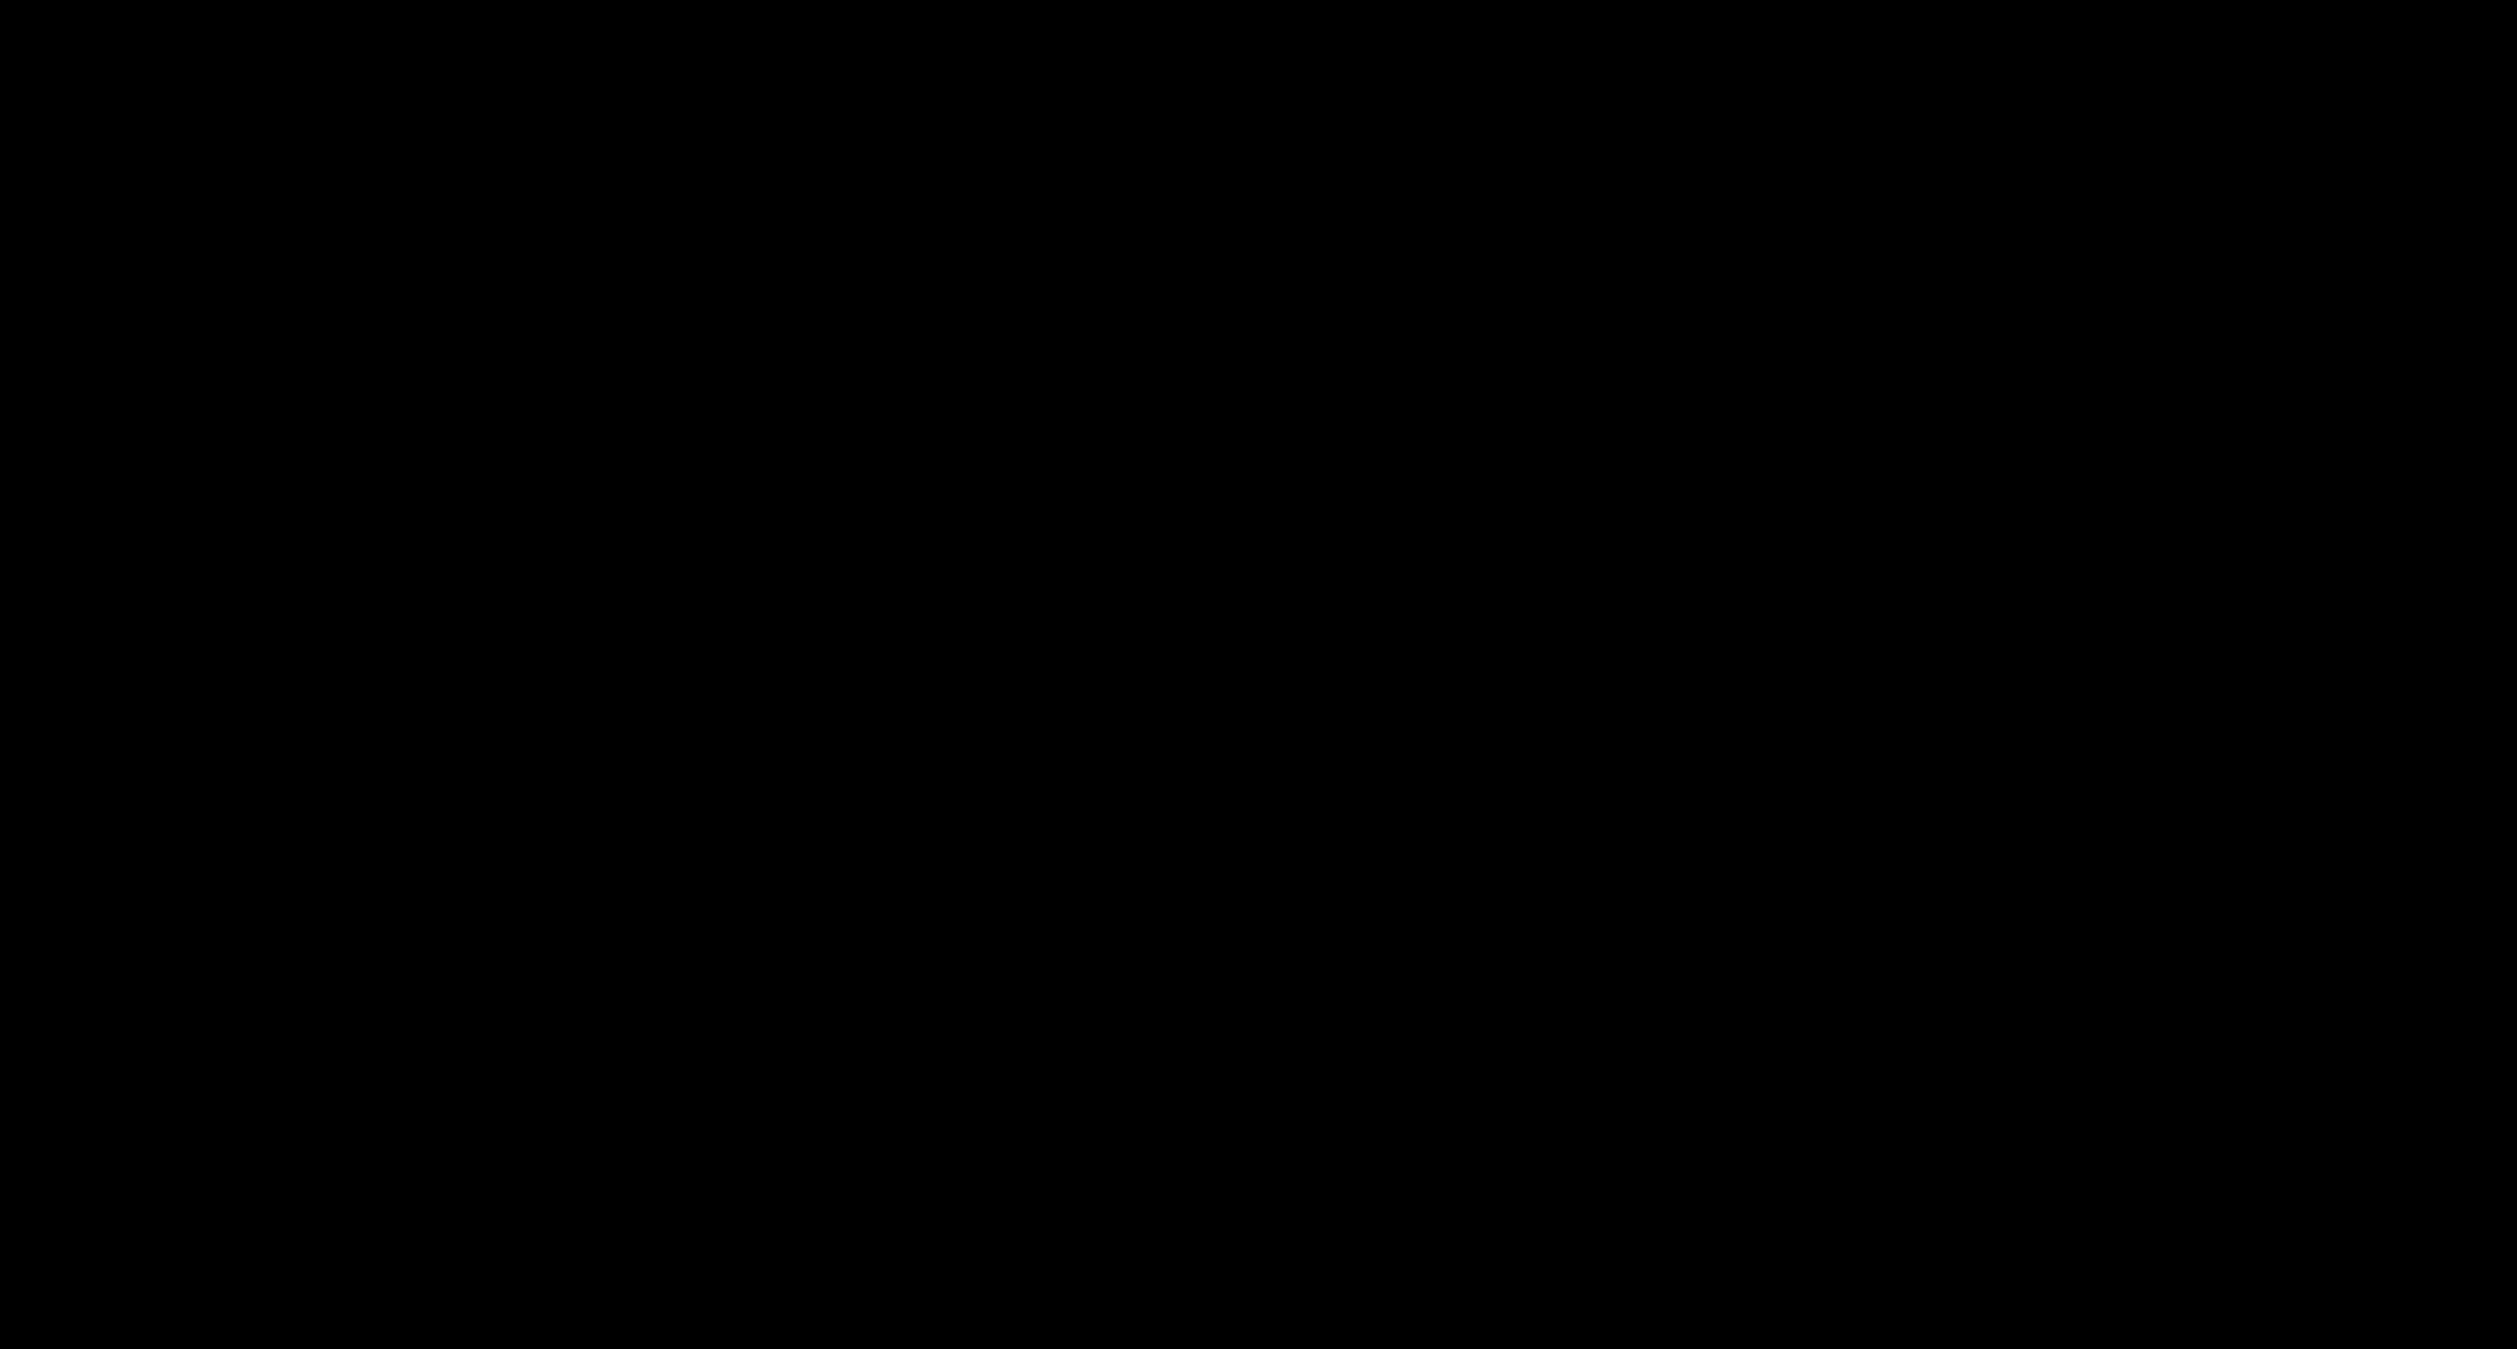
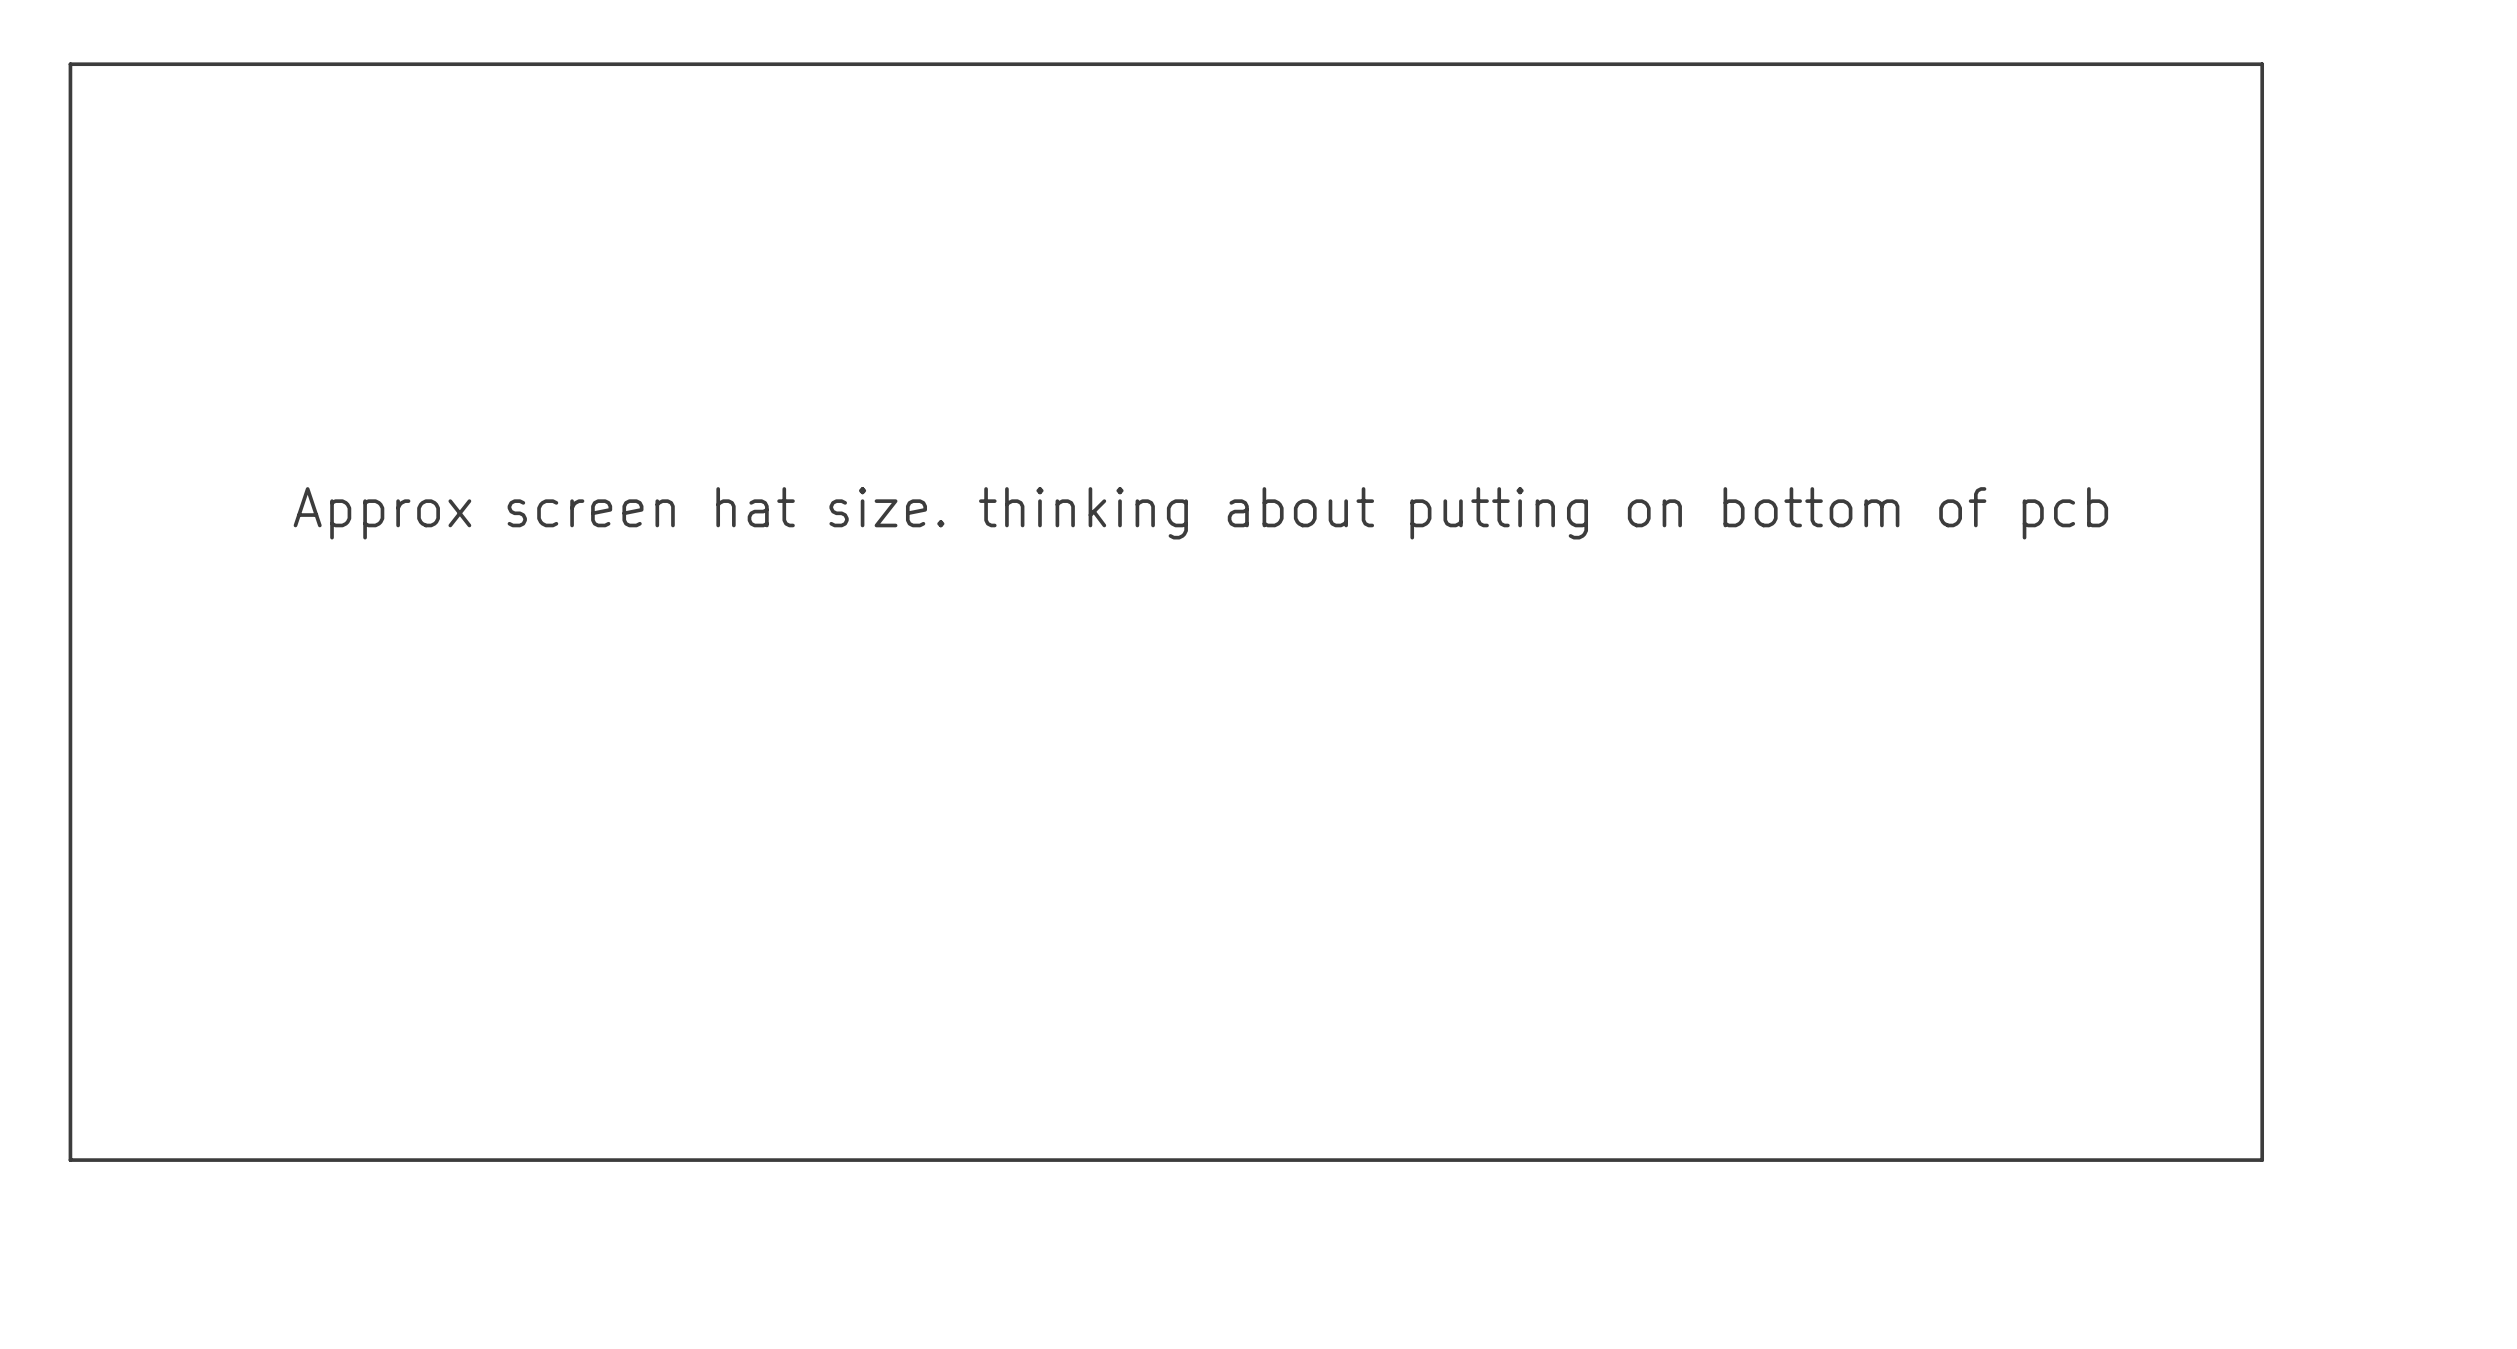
line: none -> (70, 64) (2262, 64) (2262, 1160) (70, 1160) (70, 64)
text: none -> Approx screen hat size. thinking about putting on bottom of pcb (1200, 513)

